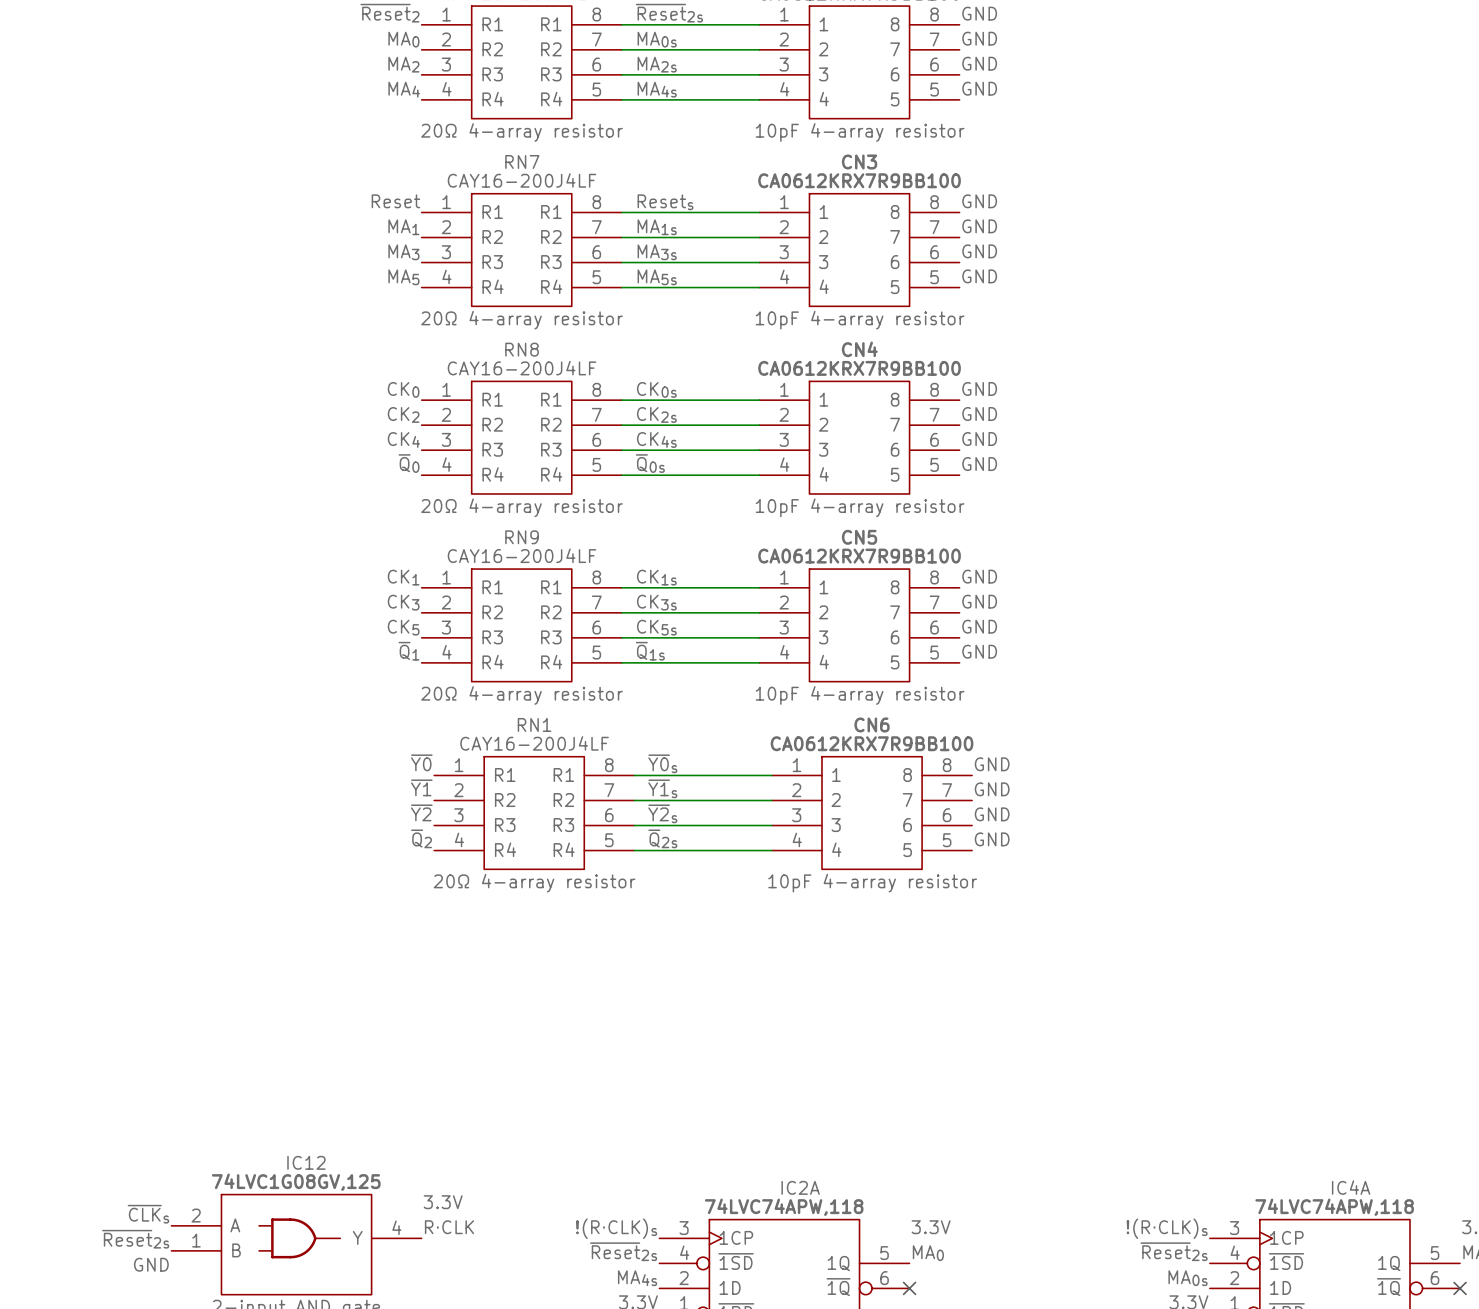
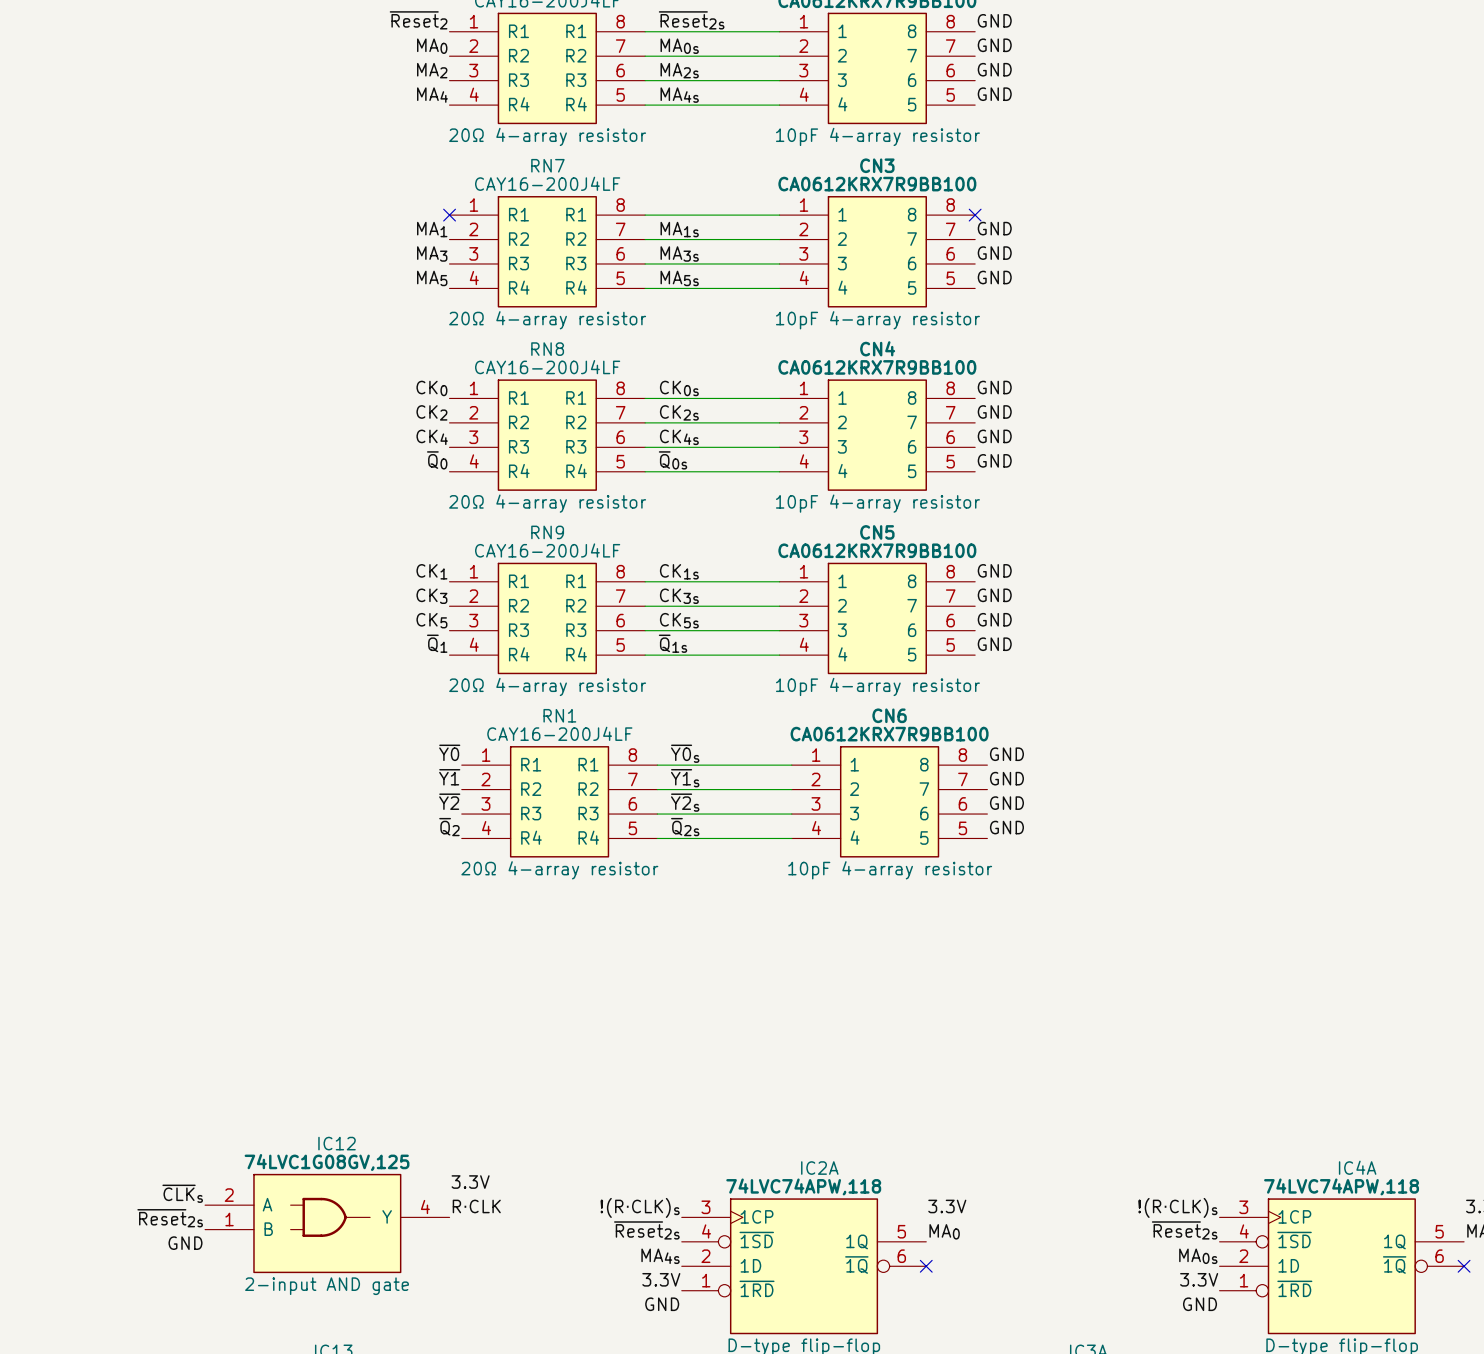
label: Reset (395, 201) -> none
label: GND (979, 201) -> none
label: Resets (665, 202) -> none
no-connect mark: none -> (449, 215)
no-connect mark: none -> (975, 215)

